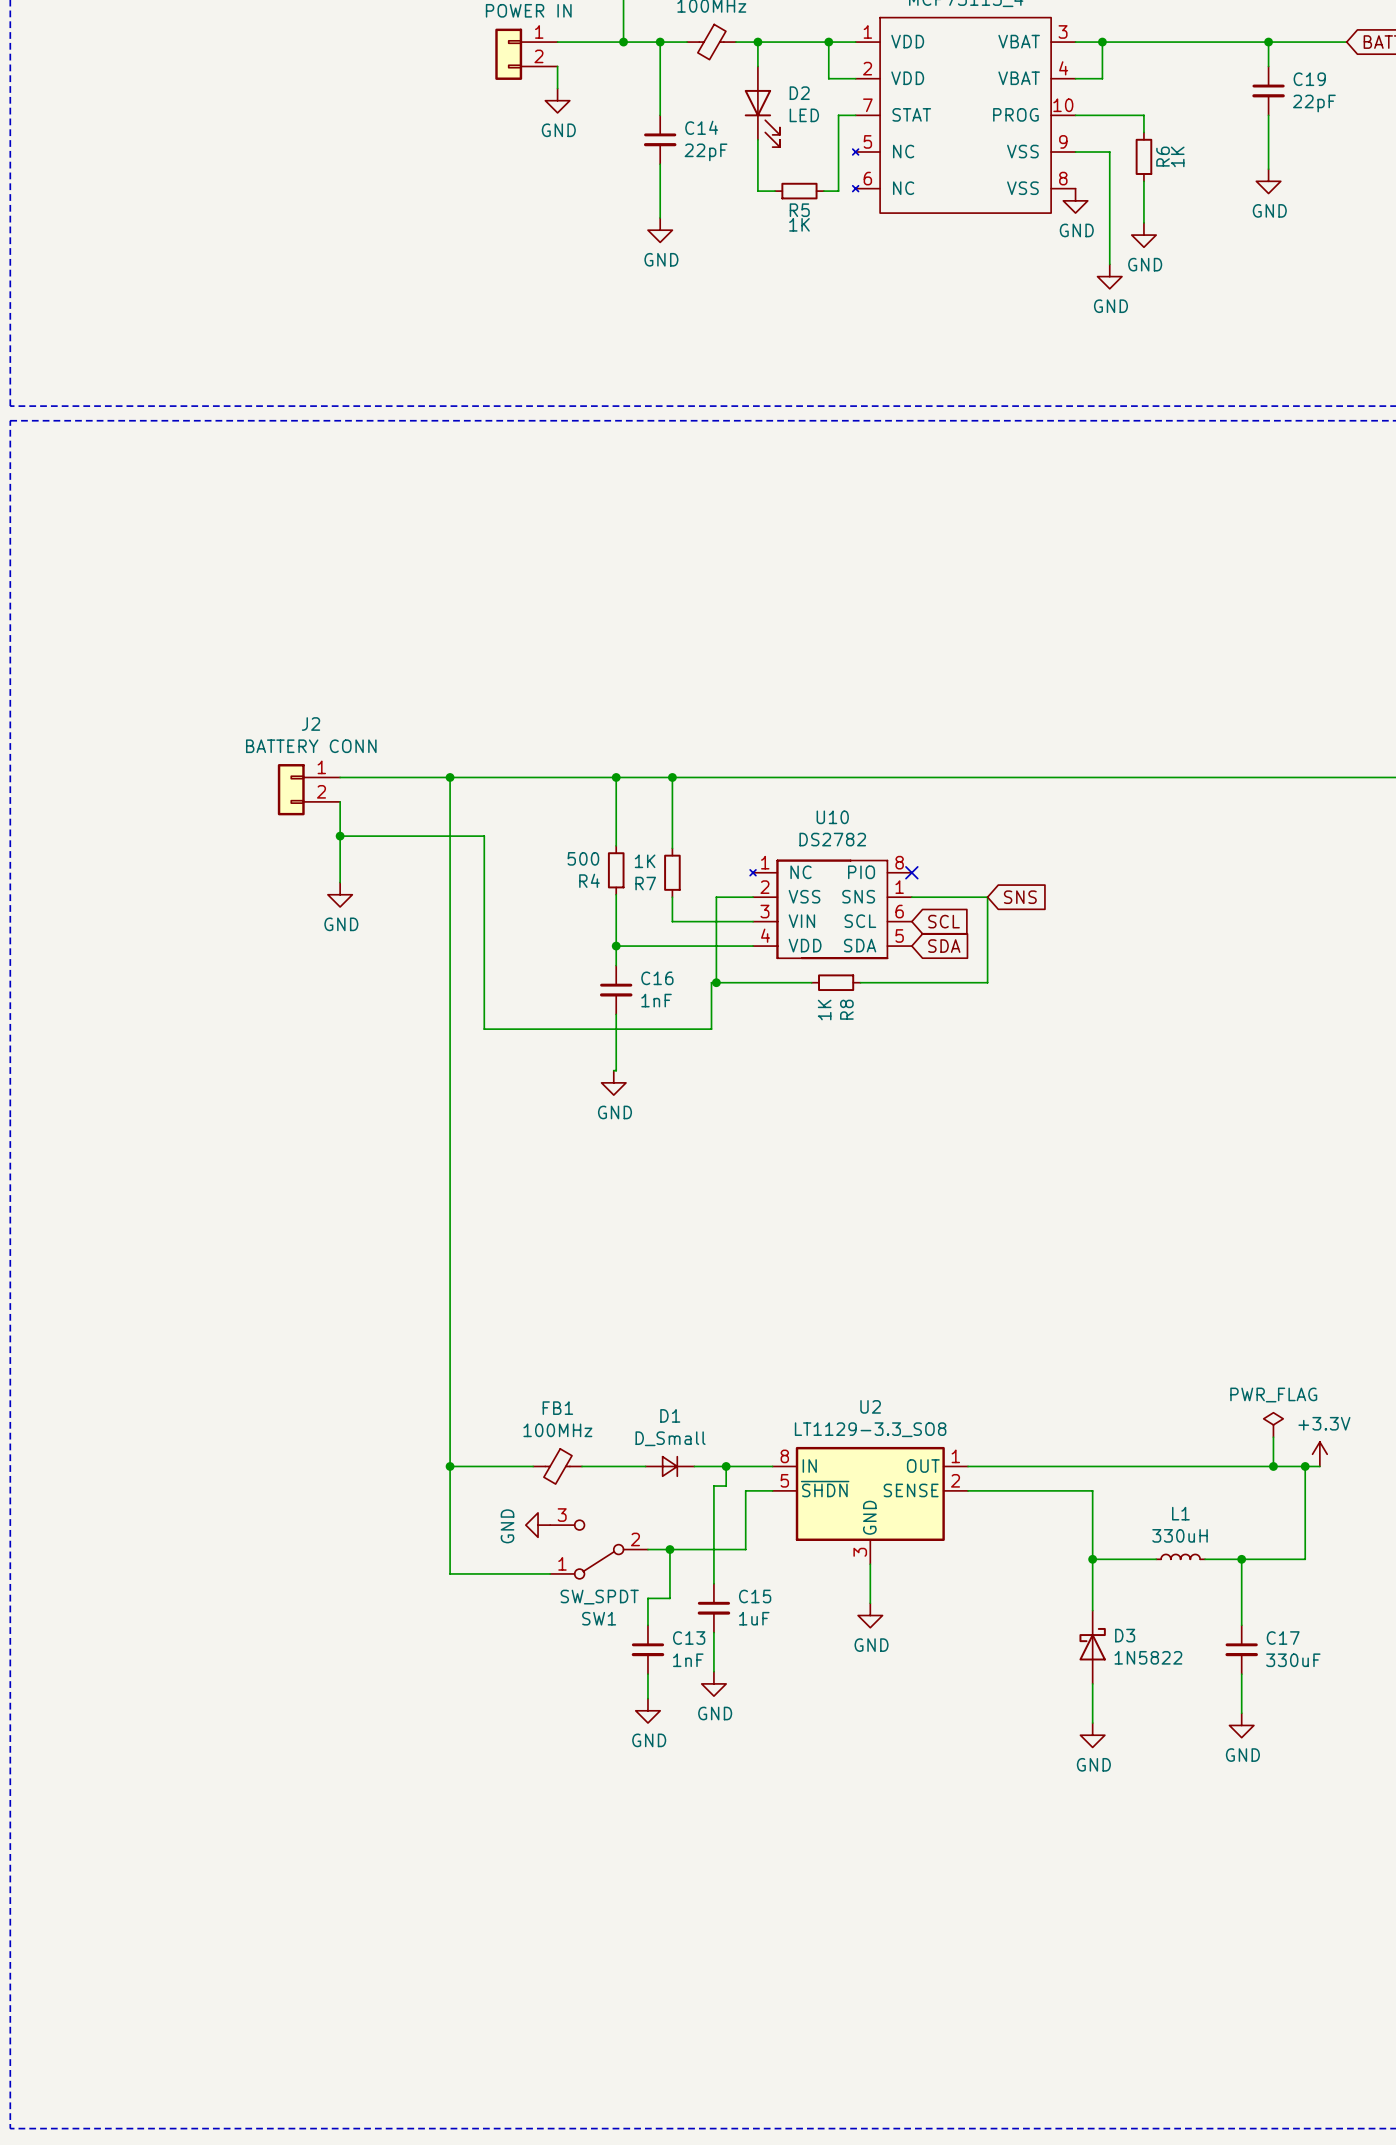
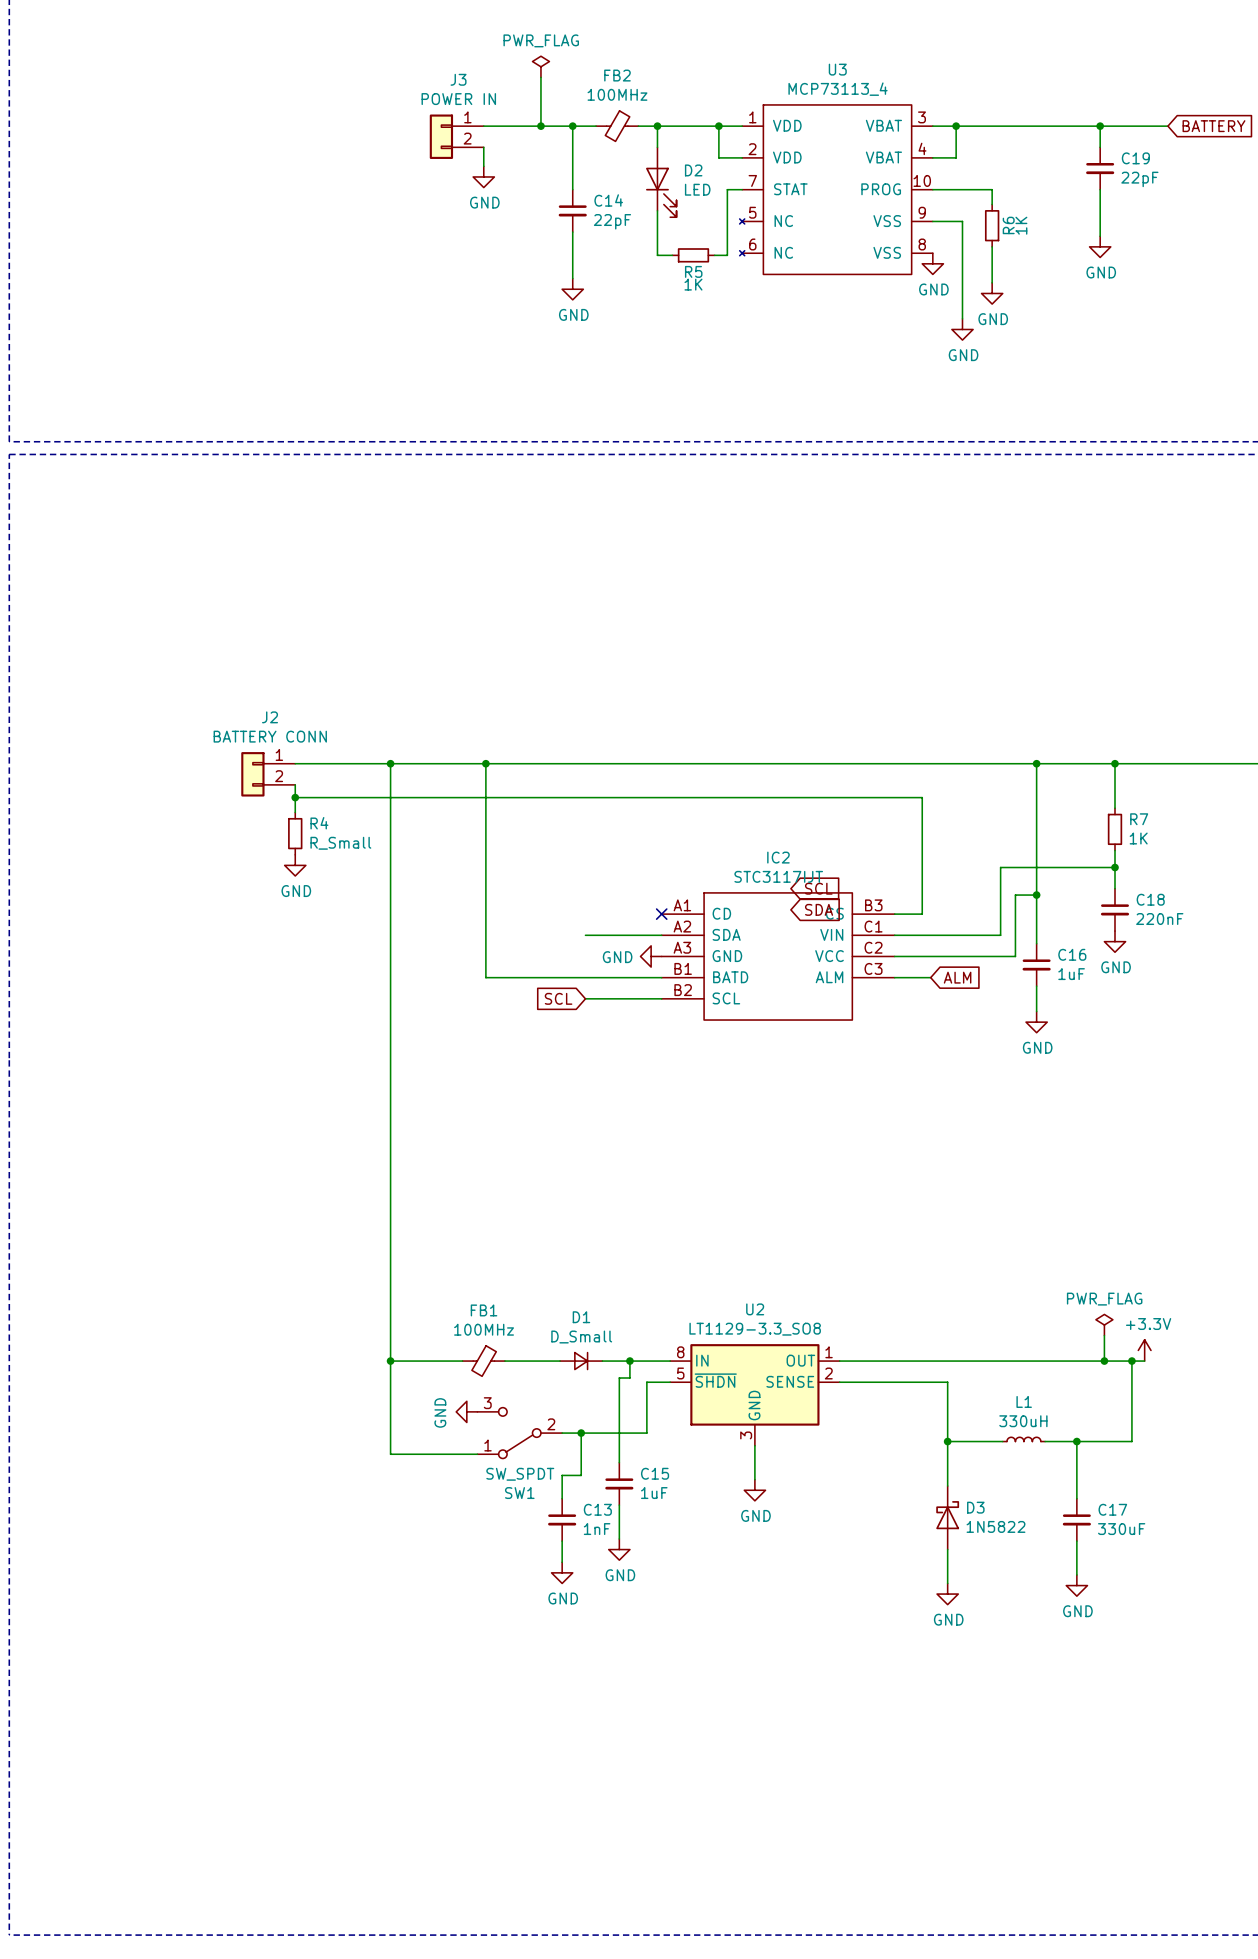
wire: none -> (485, 763) (485, 977) (661, 977)
junction: none -> (485, 763)
wire: (616, 777) (616, 845) -> none
junction: (616, 777) -> none
wire: (672, 777) (672, 848) -> none
junction: (672, 777) -> none
wire: none -> (1036, 763) (1036, 943)
junction: none -> (1036, 763)
wire: none -> (1115, 763) (1115, 808)
junction: none -> (1115, 763)
wire: none -> (295, 797) (922, 797) (922, 914) (894, 914)
wire: (340, 833) (340, 882) -> none
wire: (340, 836) (484, 836) (484, 1029) (711, 1029) (711, 982) (811, 982) -> none
junction position: (340, 836) -> (295, 797)
R4 value: 500 (583, 858) -> R_Small (340, 843)
R7 value position: 1K (645, 861) -> 1K (1138, 838)
R4 position: (616, 870) -> (295, 833)
R7 position: (672, 872) -> (1115, 829)
no-connect mark: (911, 872) -> none
wire: none -> (1115, 850) (1115, 888)
R4 name position: R4 (589, 880) -> R4 (319, 823)
R7 name position: R7 (645, 883) -> R7 (1139, 819)
wire: (616, 894) (616, 965) -> none
wire: (672, 897) (672, 921) (753, 921) -> none
wire: (753, 897) (716, 897) (716, 982) -> none
wire: (911, 897) (987, 897) (987, 982) (860, 982) -> none
global label: SNS (1020, 897) -> none
wire: none -> (1115, 867) (1000, 867) (1000, 935) (894, 935)
junction: none -> (1115, 867)
U10: DS2782 (831, 909) -> none
wire: none -> (1036, 895) (1015, 895) (1015, 956) (894, 956)
junction: none -> (1036, 895)
wire: (616, 946) (753, 946) -> none
junction: (616, 946) -> none
C18: none -> 220nF (1115, 909)
no-connect mark: none -> (661, 914)
wire: none -> (585, 935) (661, 935)
junction: (716, 982) -> none
R8: 1K (836, 982) -> none
power symbol: none -> GND (1115, 941)
C16 position: (616, 990) -> (1036, 964)
IC2: none -> STC3117IJT (778, 956)
C16 value: 1nF (656, 1000) -> 1uF (1071, 974)
wire: (616, 1014) (616, 1070) (613, 1070) -> none
wire: none -> (894, 977) (930, 977)
global label: none -> ALM (957, 977)
wire: none -> (1036, 986) (1036, 1011)
global label: none -> SCL (558, 998)
wire: none -> (585, 998) (661, 998)
power symbol: none -> GND (1036, 1022)
power symbol rotation: 0° (613, 1082) -> 90° clockwise (651, 956)
power symbol position: GND (613, 1082) -> GND (651, 956)

